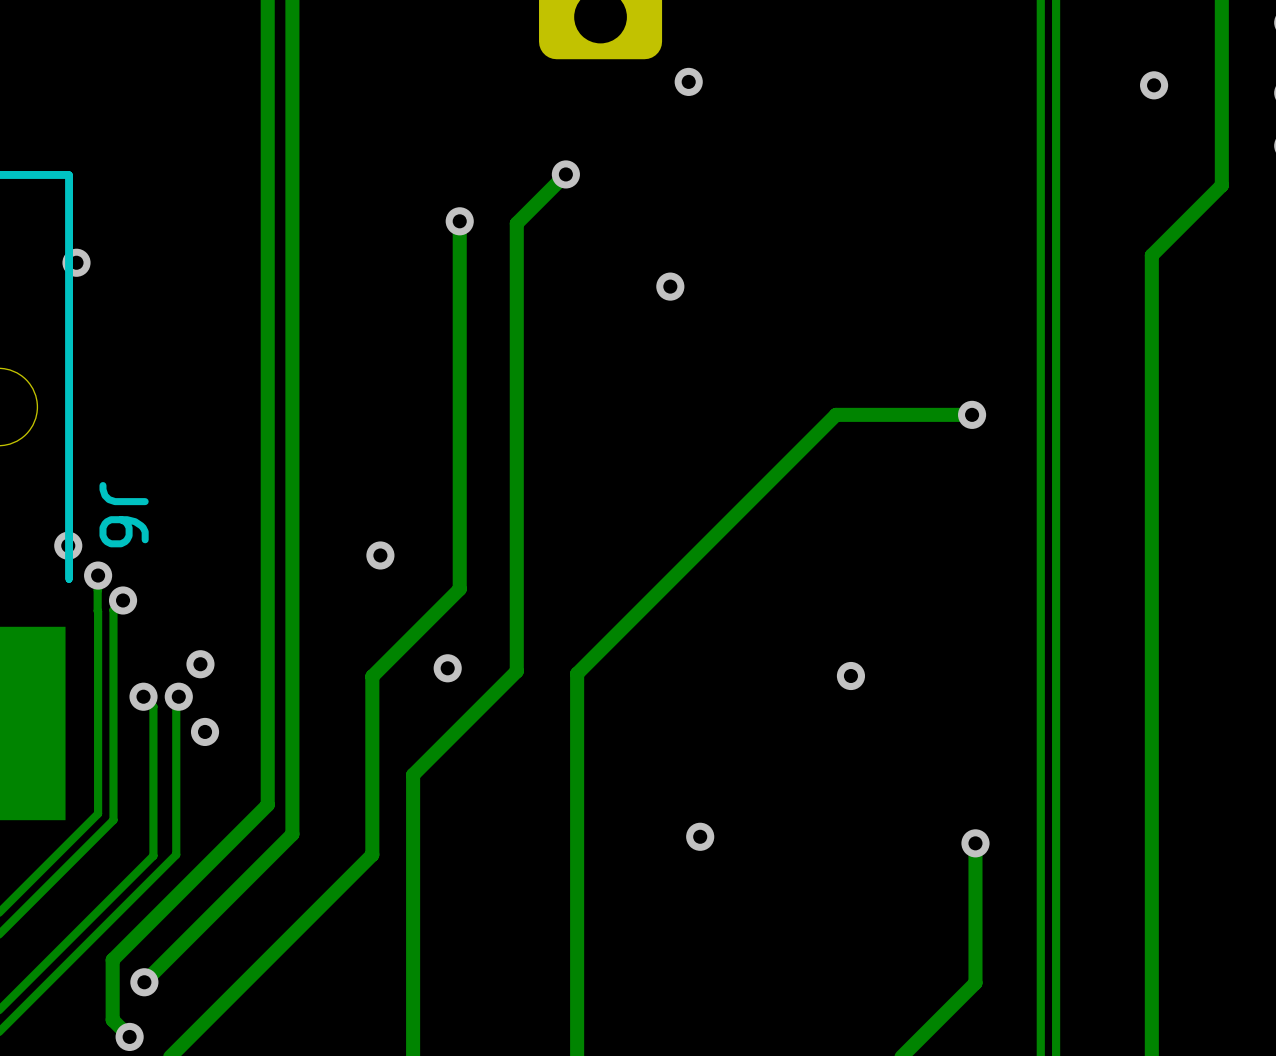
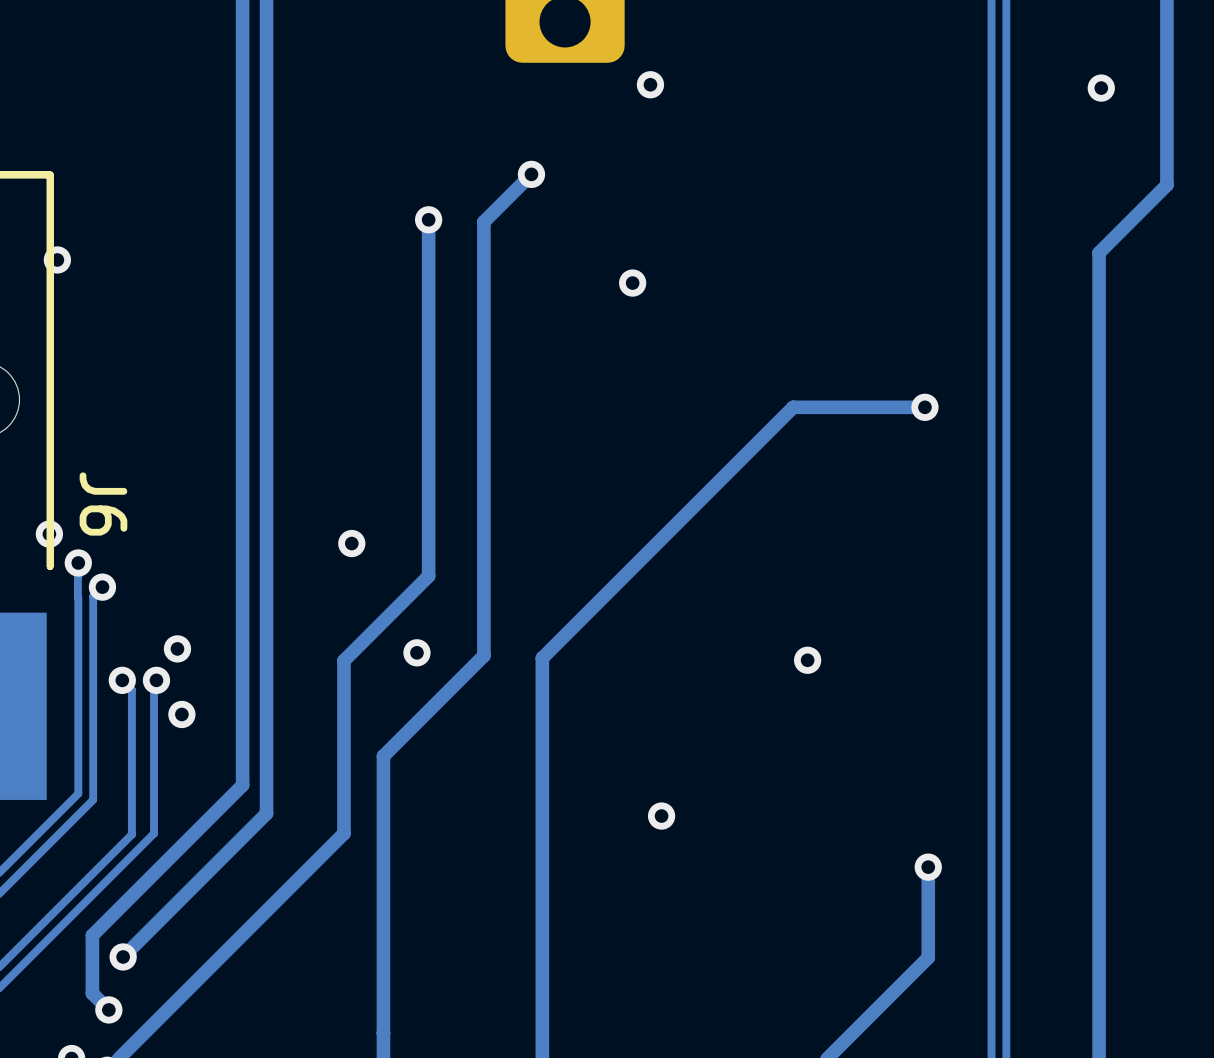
track: (975, 843) (975, 889) -> none
via position: (975, 843) -> (928, 867)

